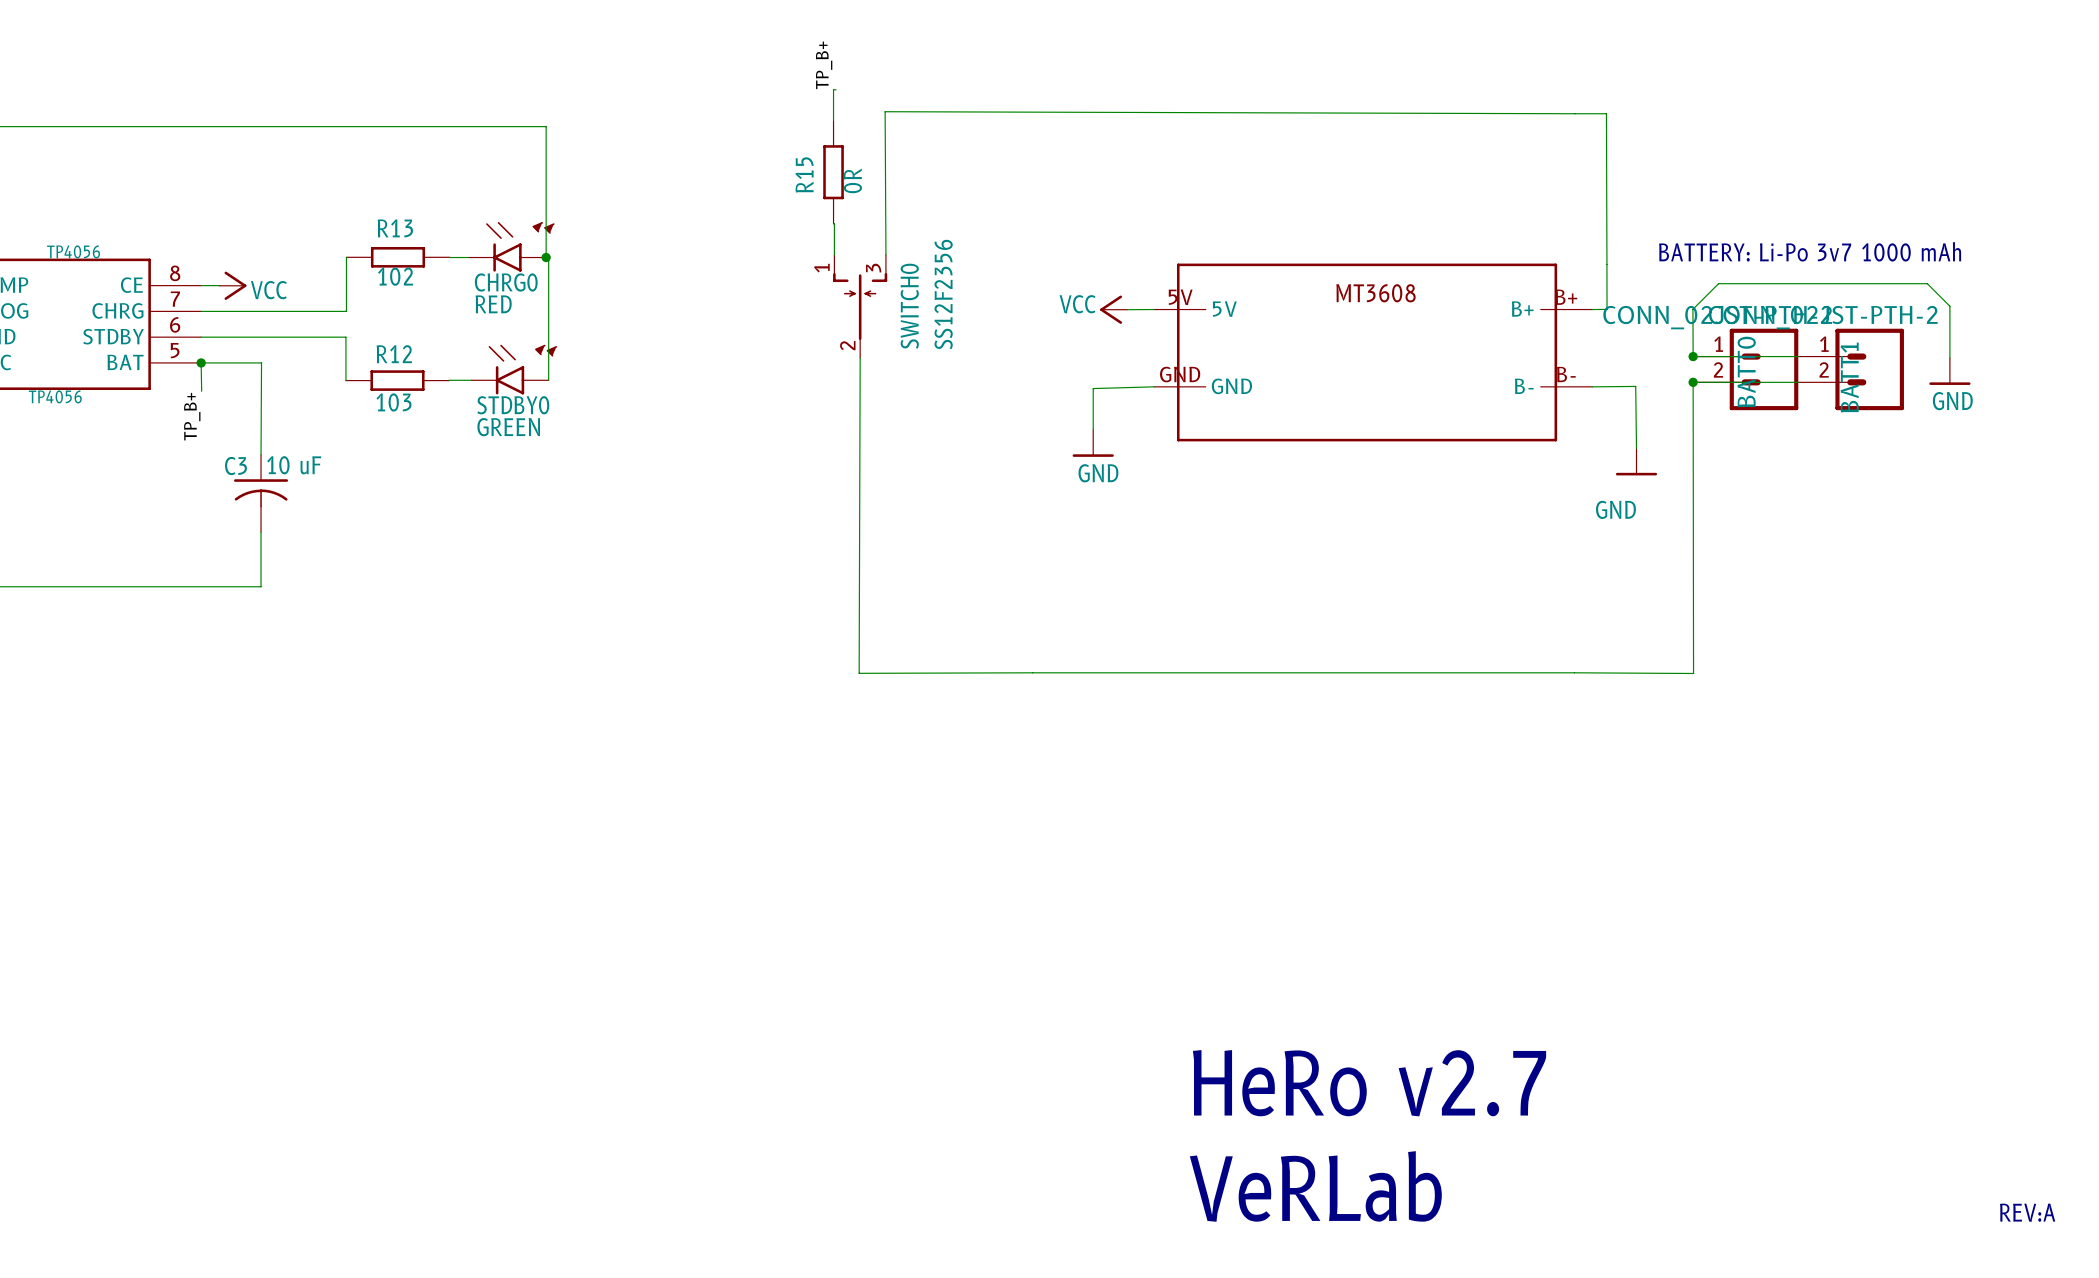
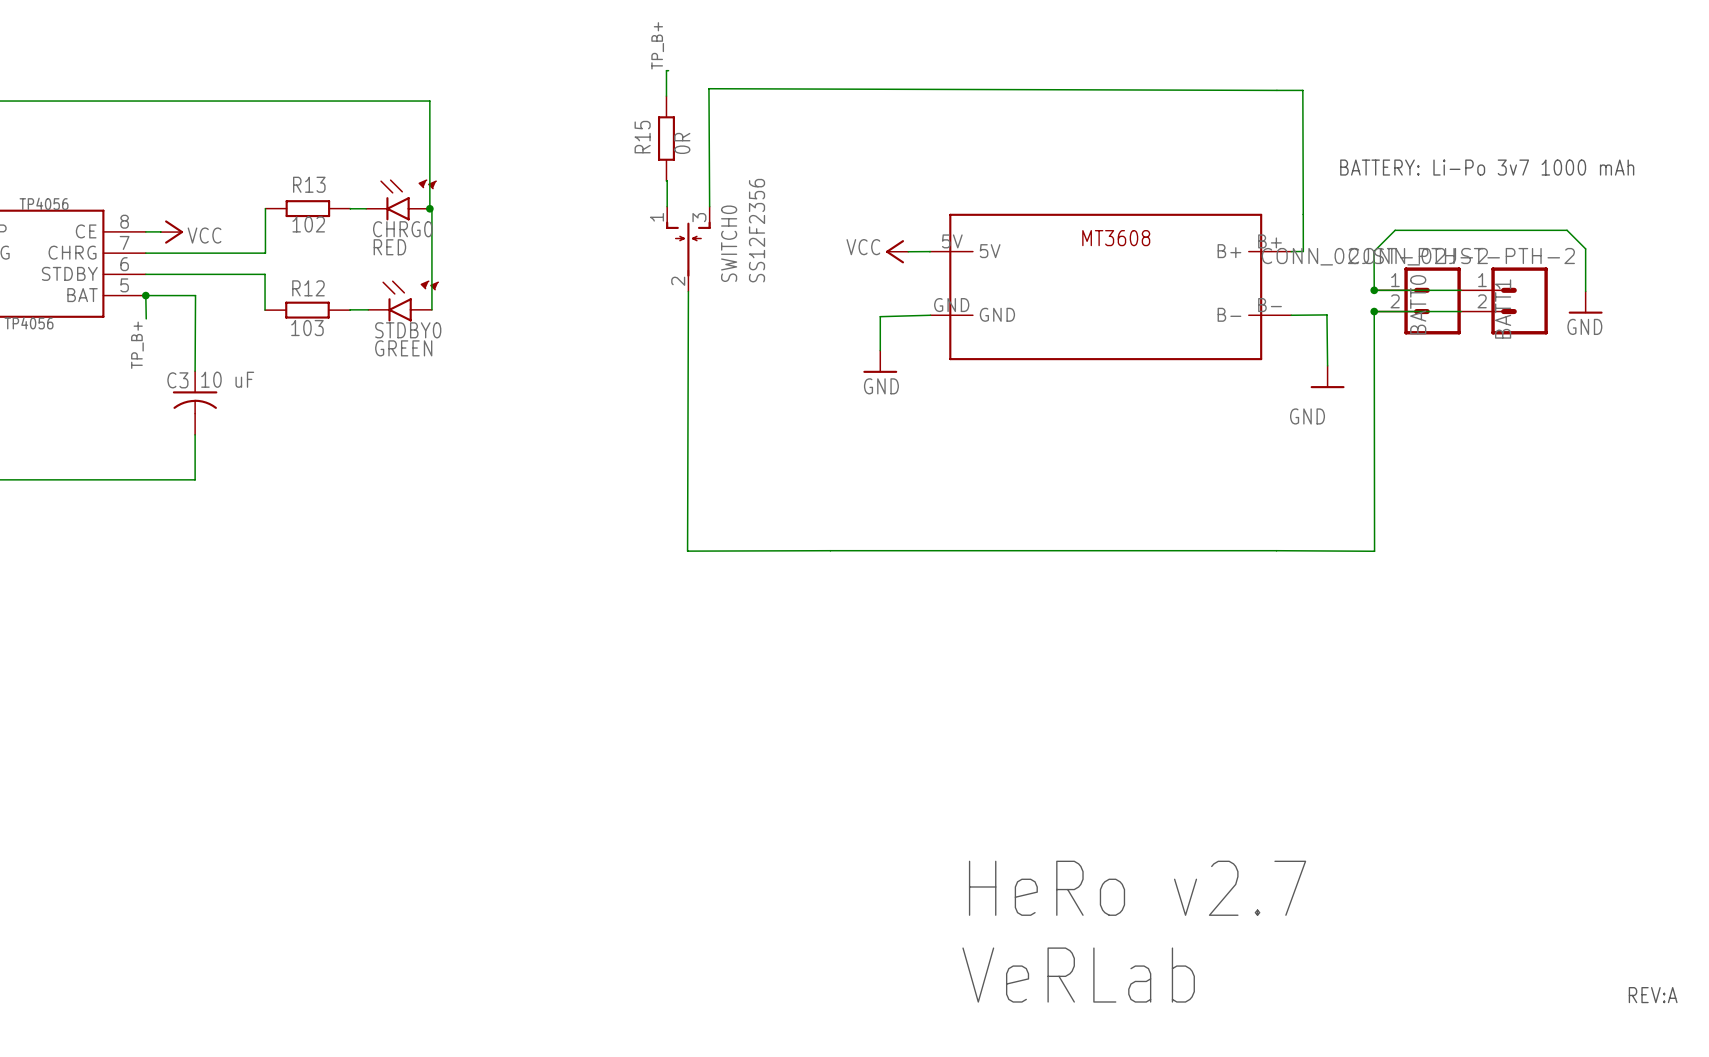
text position: BATTERY: Li-Po 3v7 1000 mAh (1810, 251) -> BATTERY: Li-Po 3v7 1000 mAh (1487, 167)

